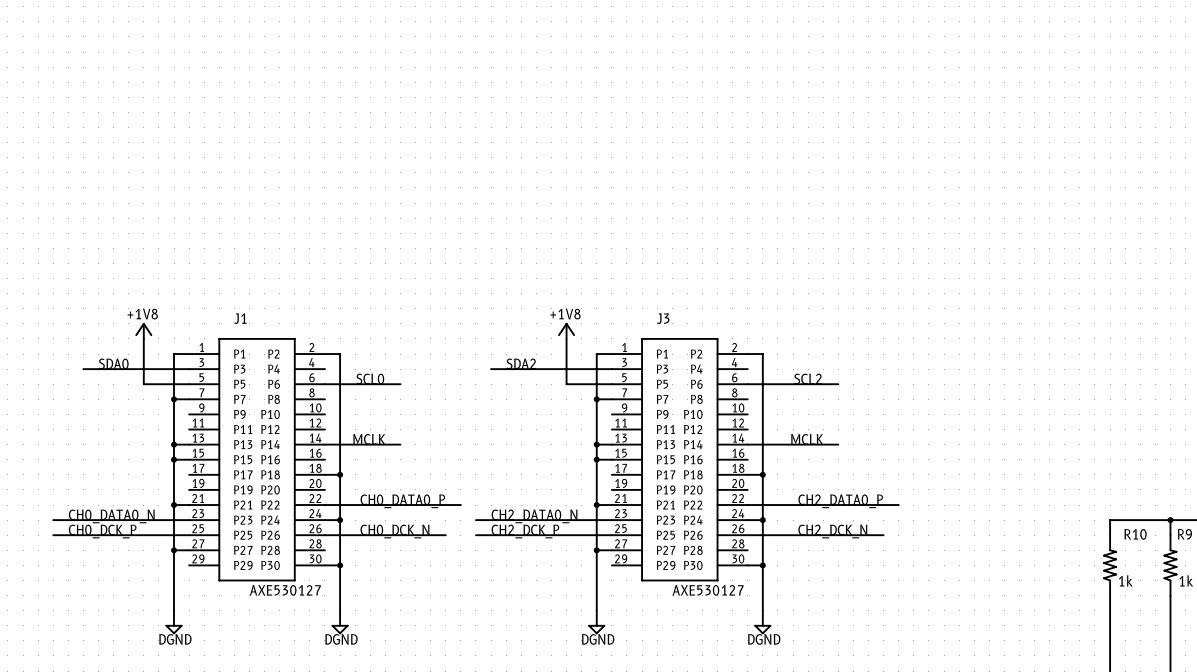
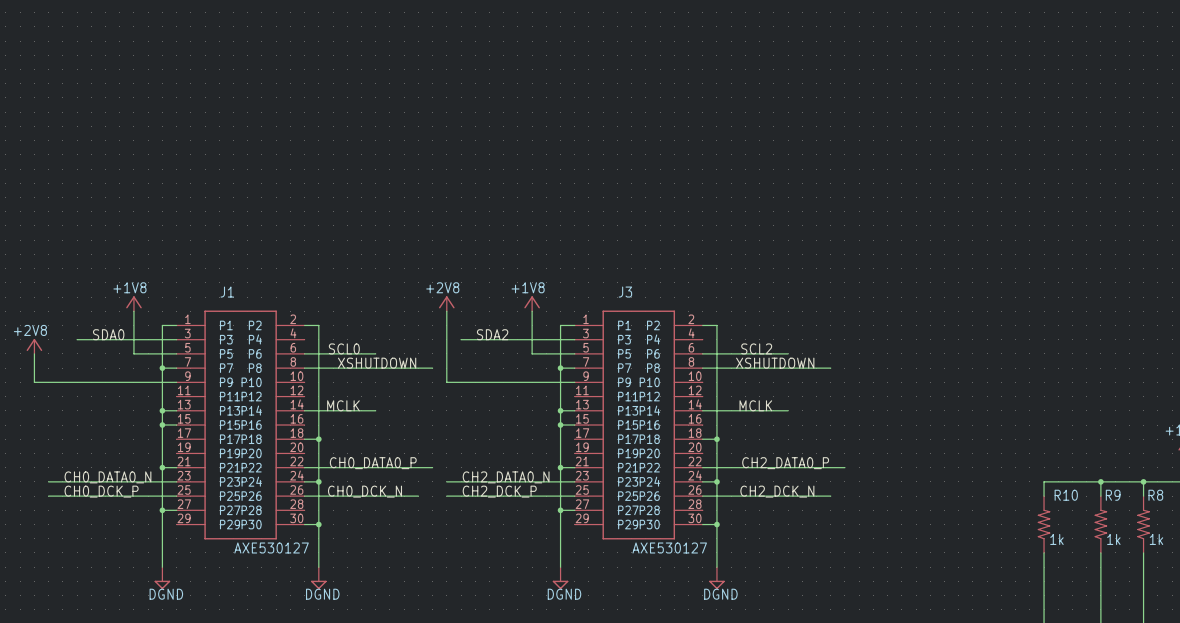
power symbol: none -> +2V8 (446, 303)
wire: none -> (446, 311) (446, 382) (574, 382)
power symbol: none -> +2V8 (34, 346)
wire: none -> (34, 353) (34, 382) (176, 382)
label: none -> XSHUTDOWN (377, 363)
label: none -> XSHUTDOWN (775, 363)
wire: none -> (304, 368) (432, 368)
wire: none -> (702, 368) (830, 368)

